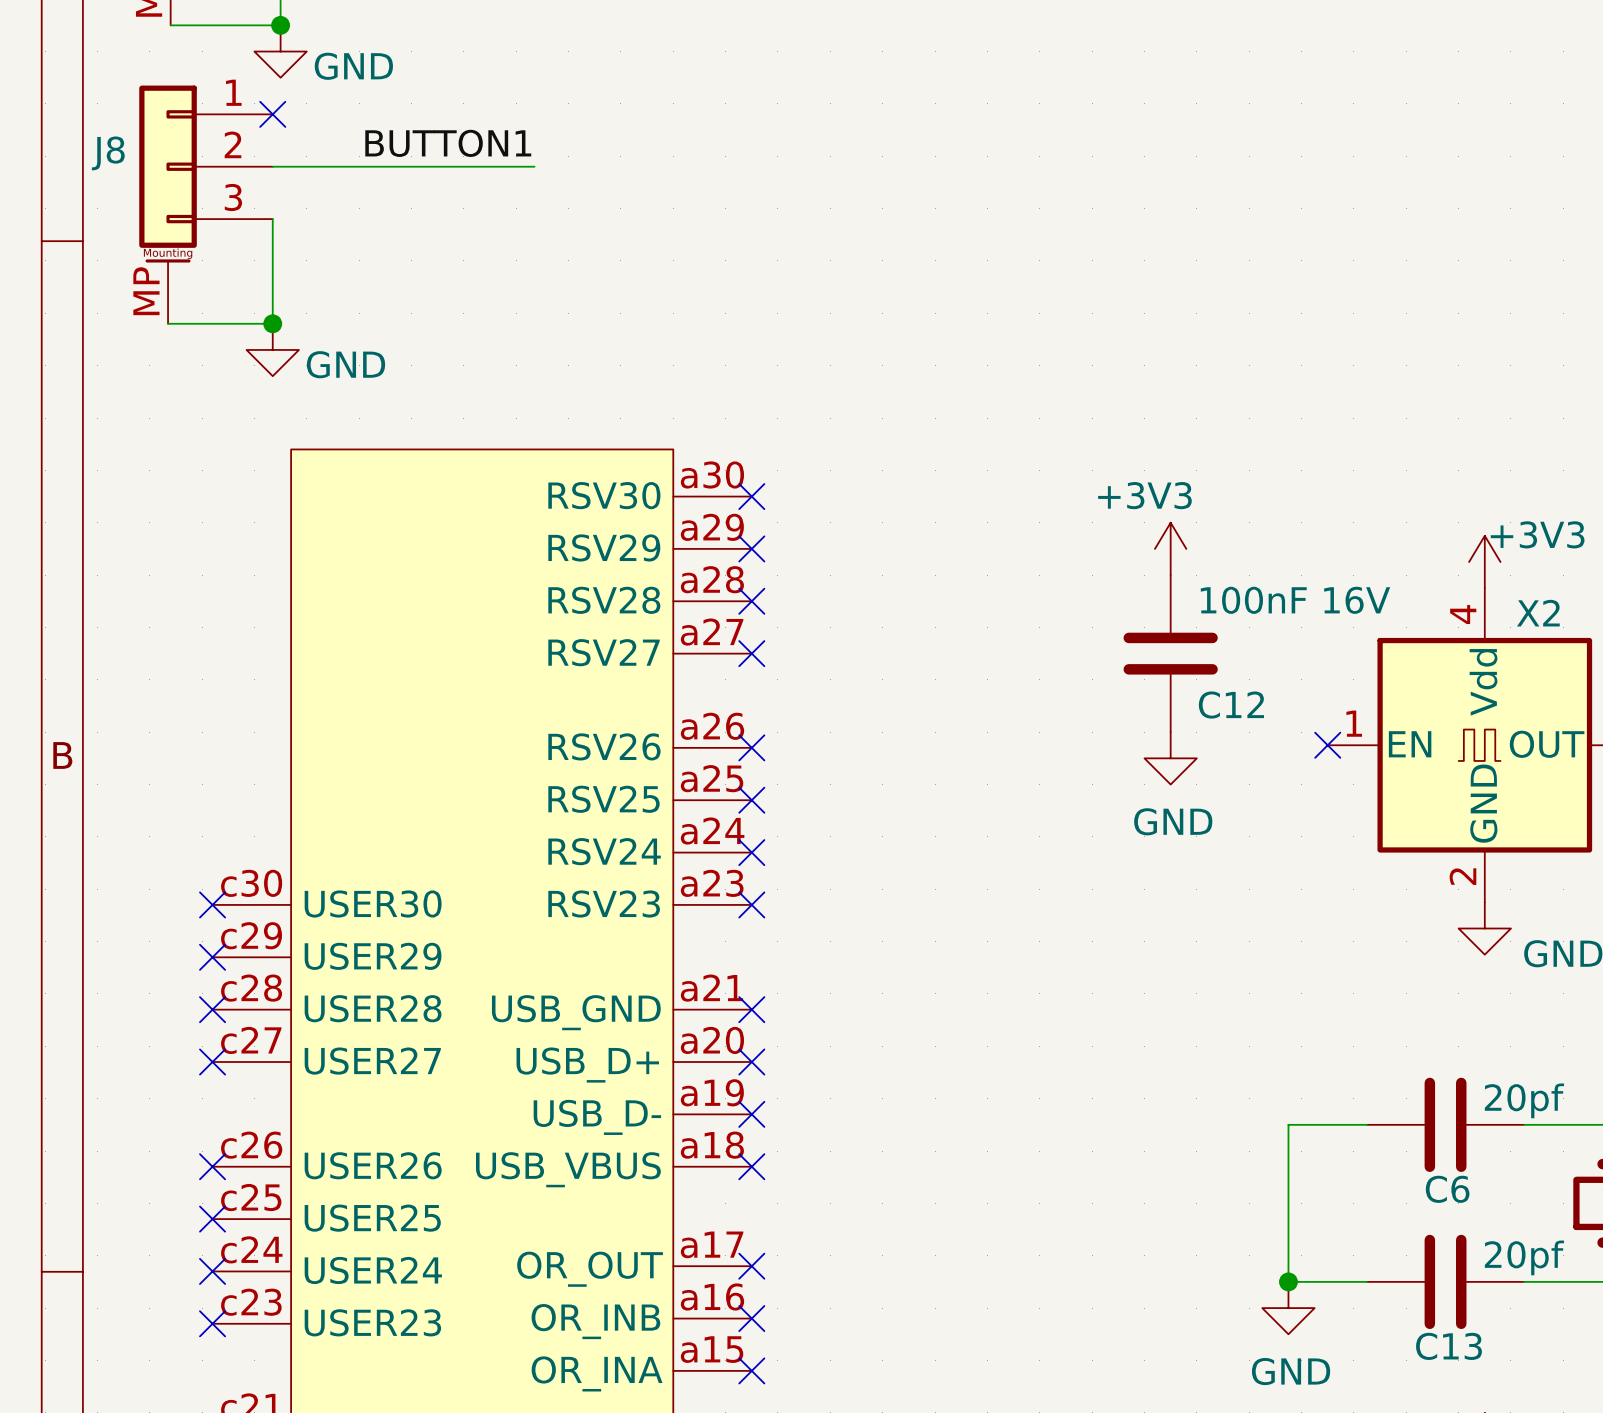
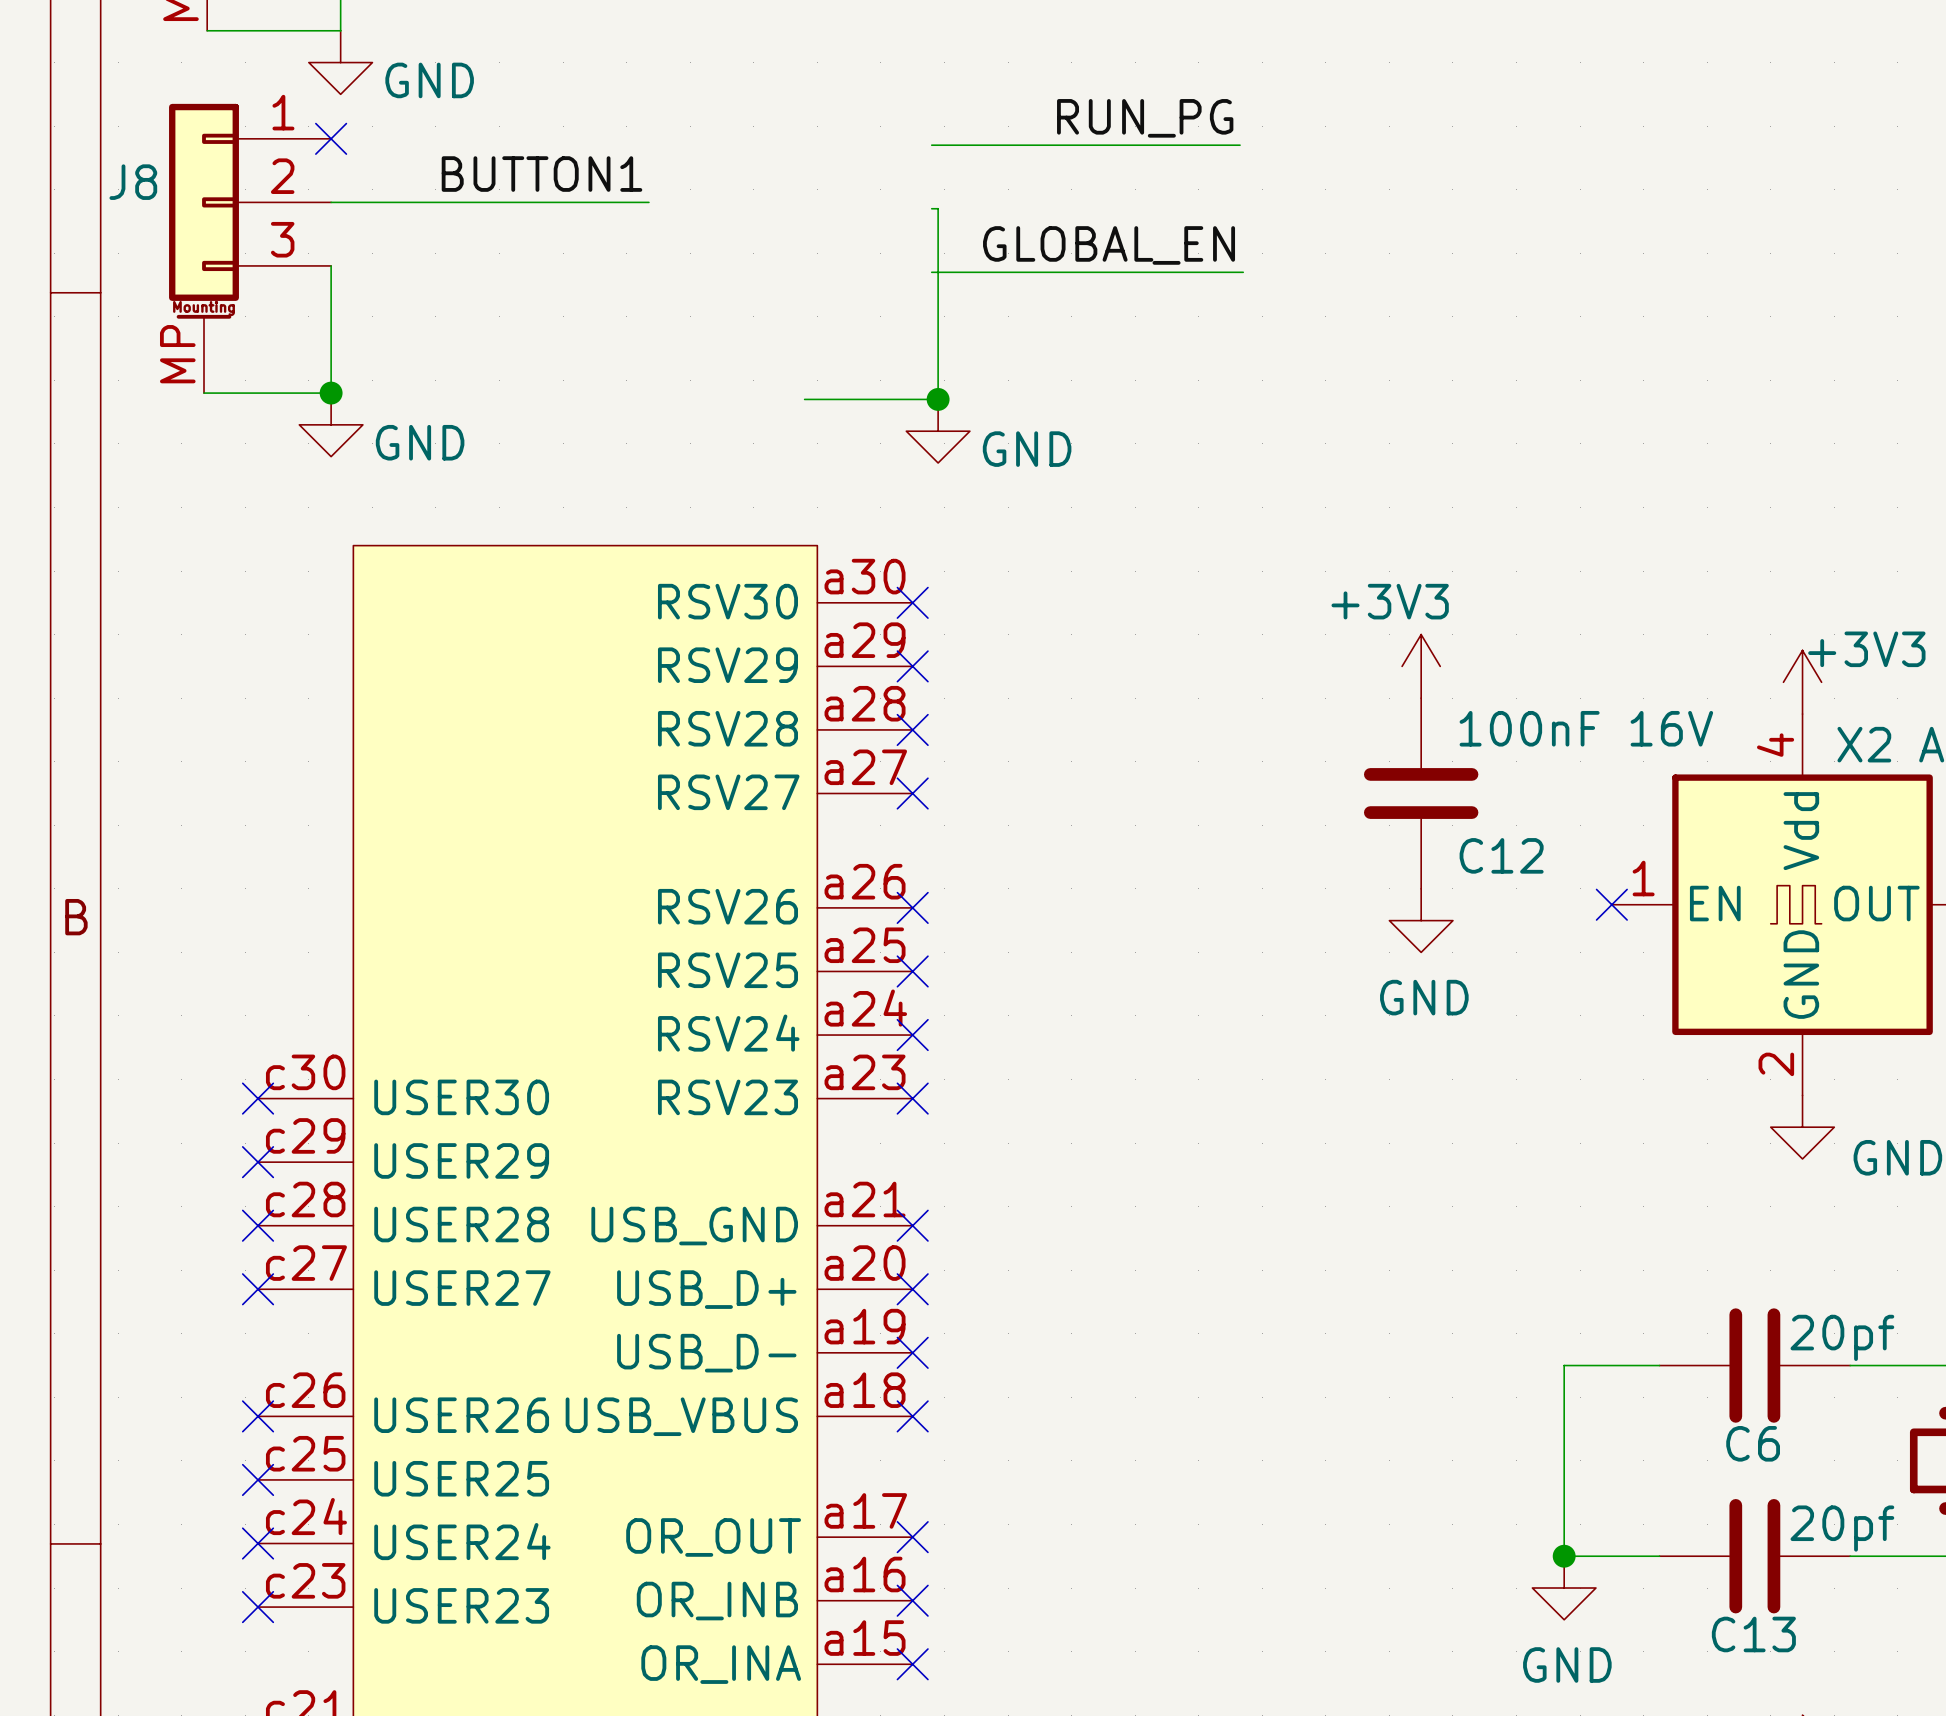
junction: (280, 25) -> none
label: none -> RUN_PG (1145, 118)
wire: none -> (931, 145) (1240, 145)
wire: none -> (931, 208) (938, 208) (938, 399) (804, 399)
label: none -> GLOBAL_EN (1109, 245)
wire: none -> (931, 272) (1243, 272)
junction: none -> (938, 399)
power symbol: none -> GND (938, 431)

